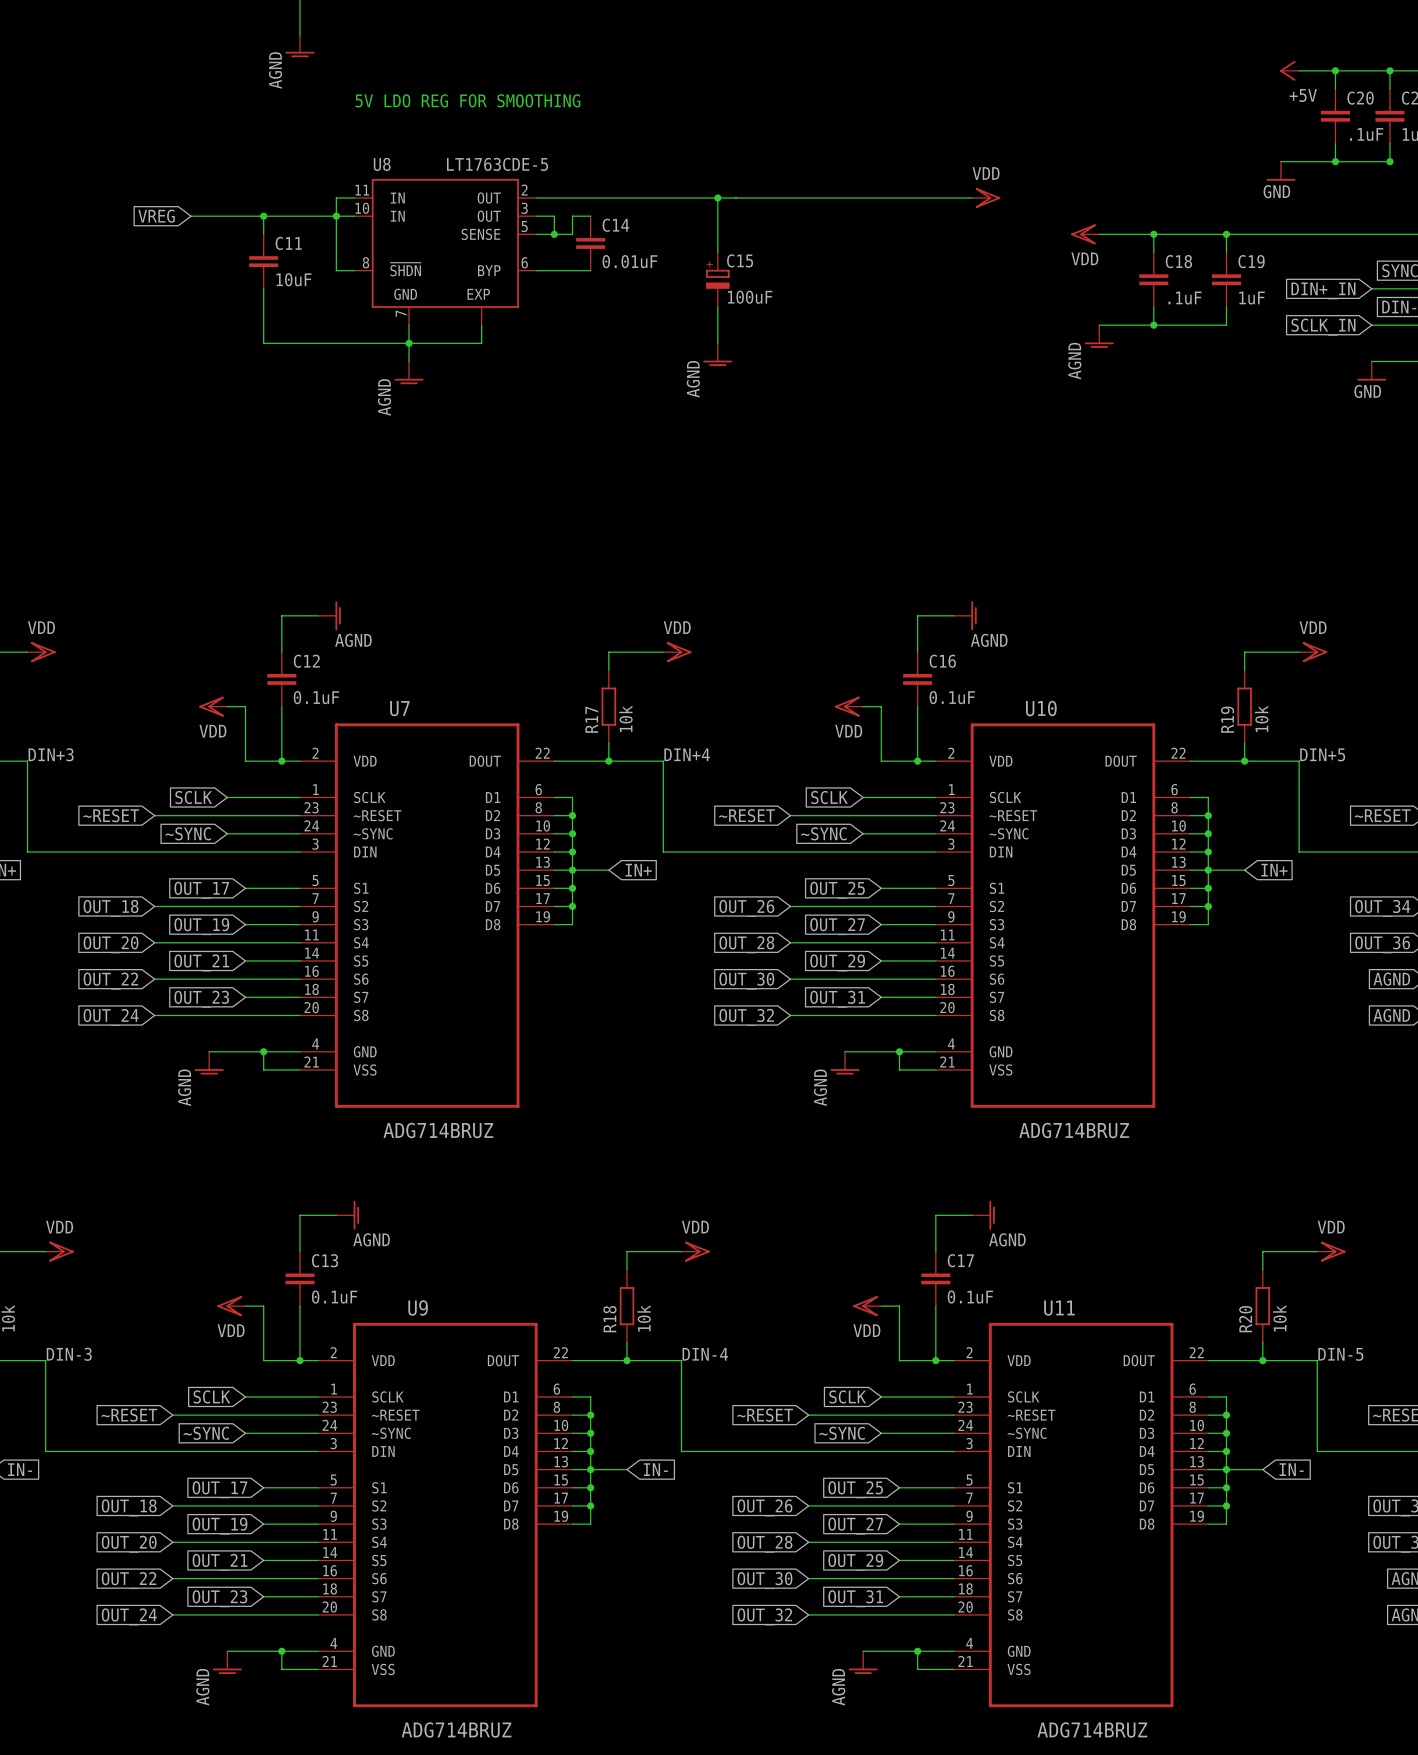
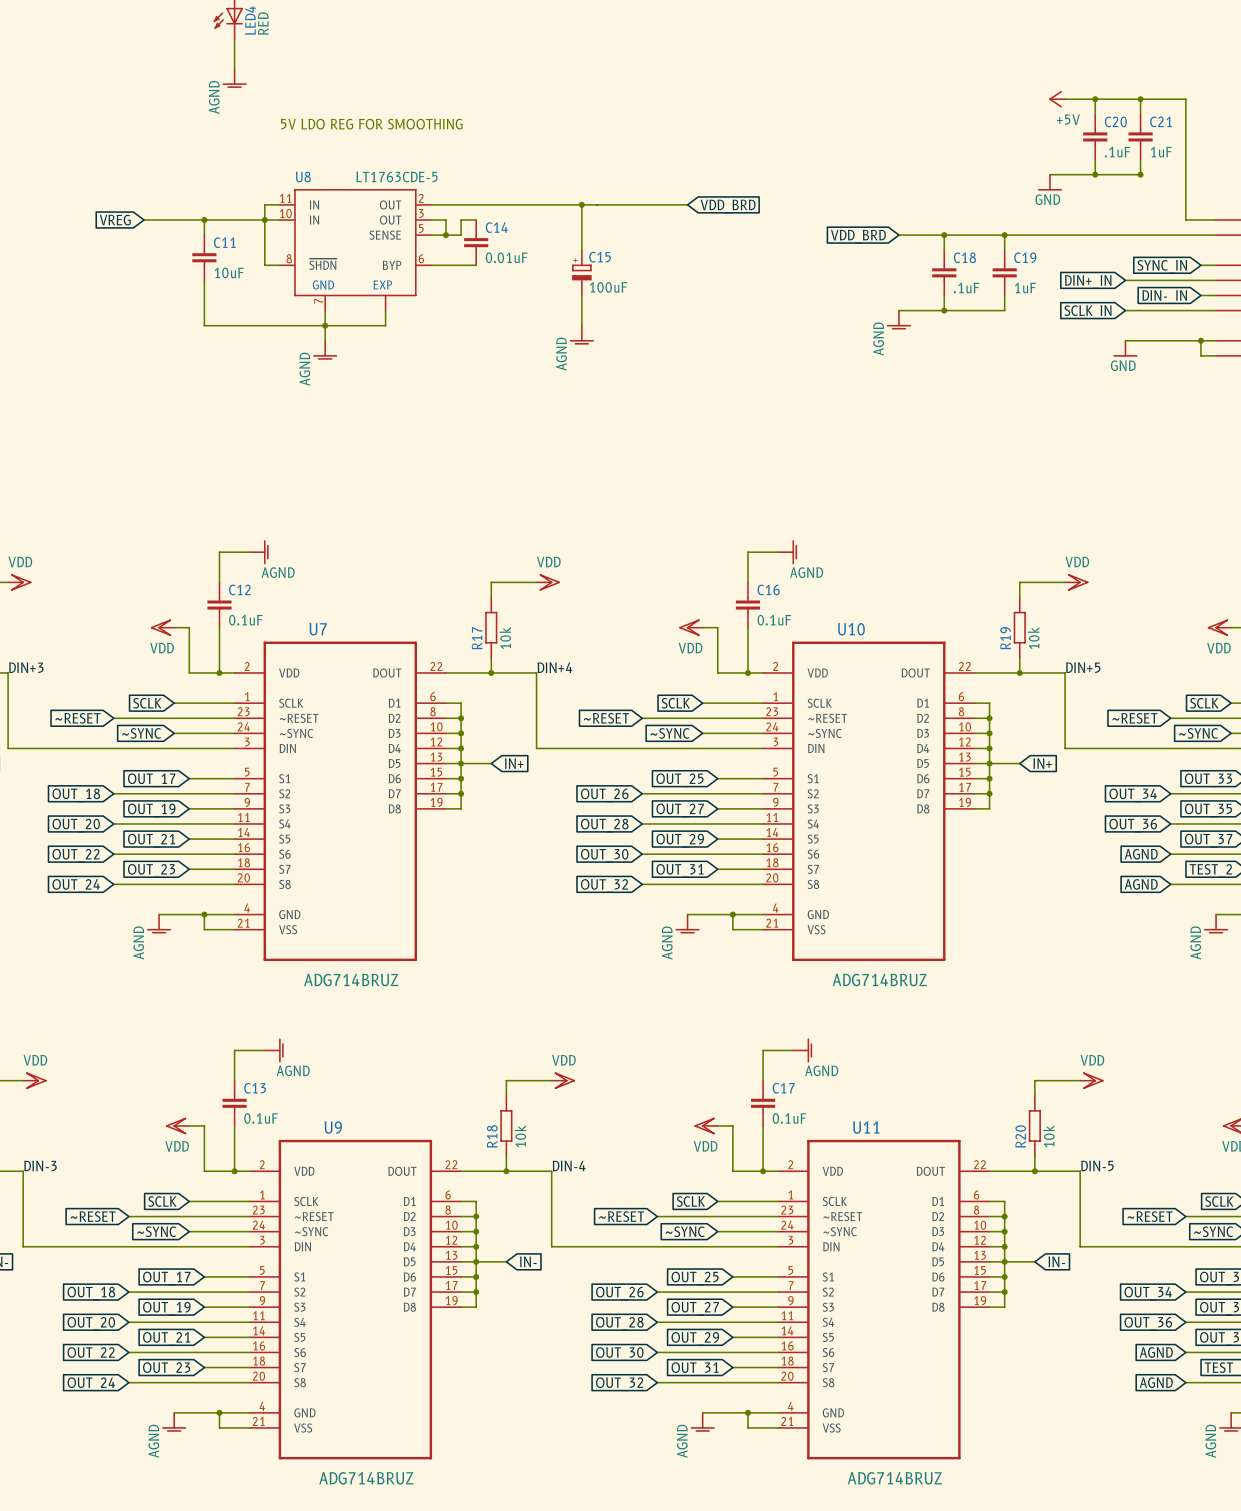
wire: (844, 198) (972, 198) -> none
power symbol: VDD (986, 198) -> none
global label: none -> VDD_BRD (728, 206)
power symbol: VDD (1085, 234) -> none
global label: none -> VDD_BRD (858, 236)

